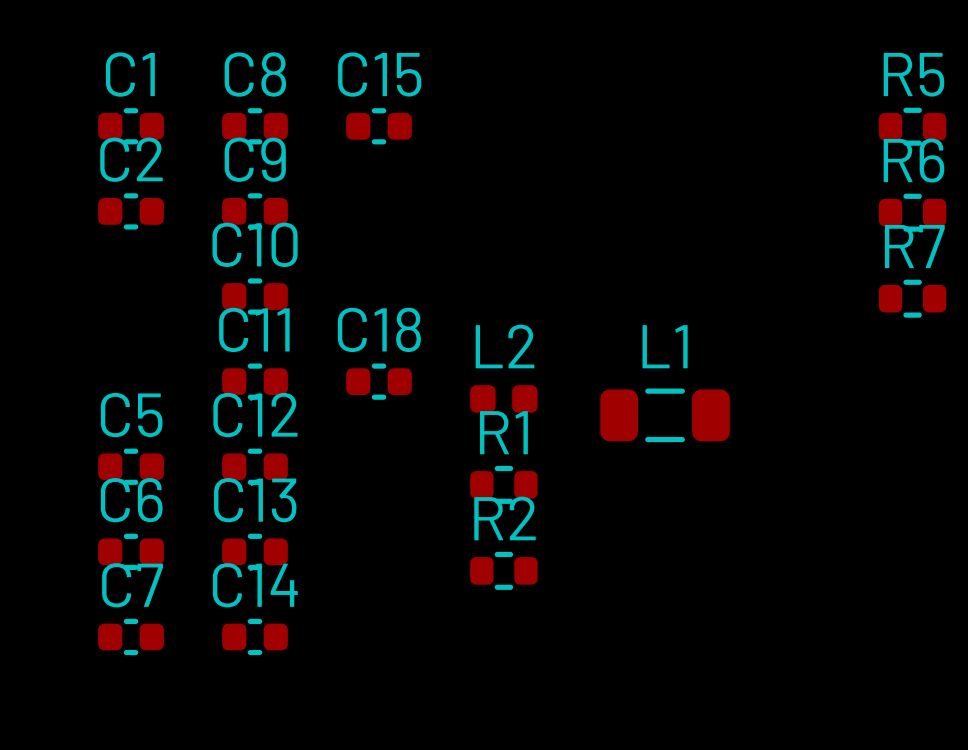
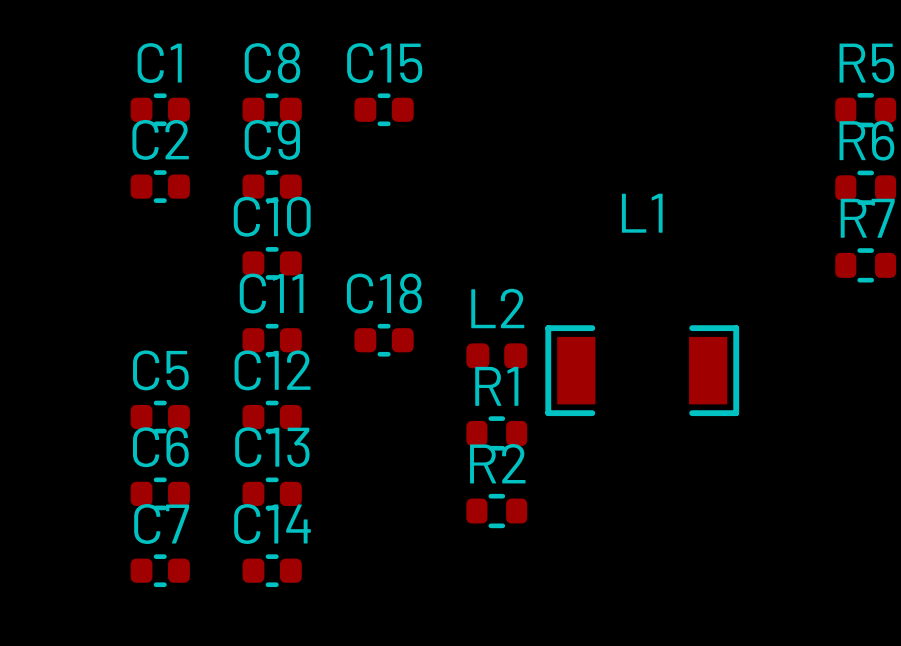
L1 name position: L1 (665, 346) -> L1 (642, 213)
L1 footprint: [600, 388, 730, 443] -> [545, 325, 740, 417]

